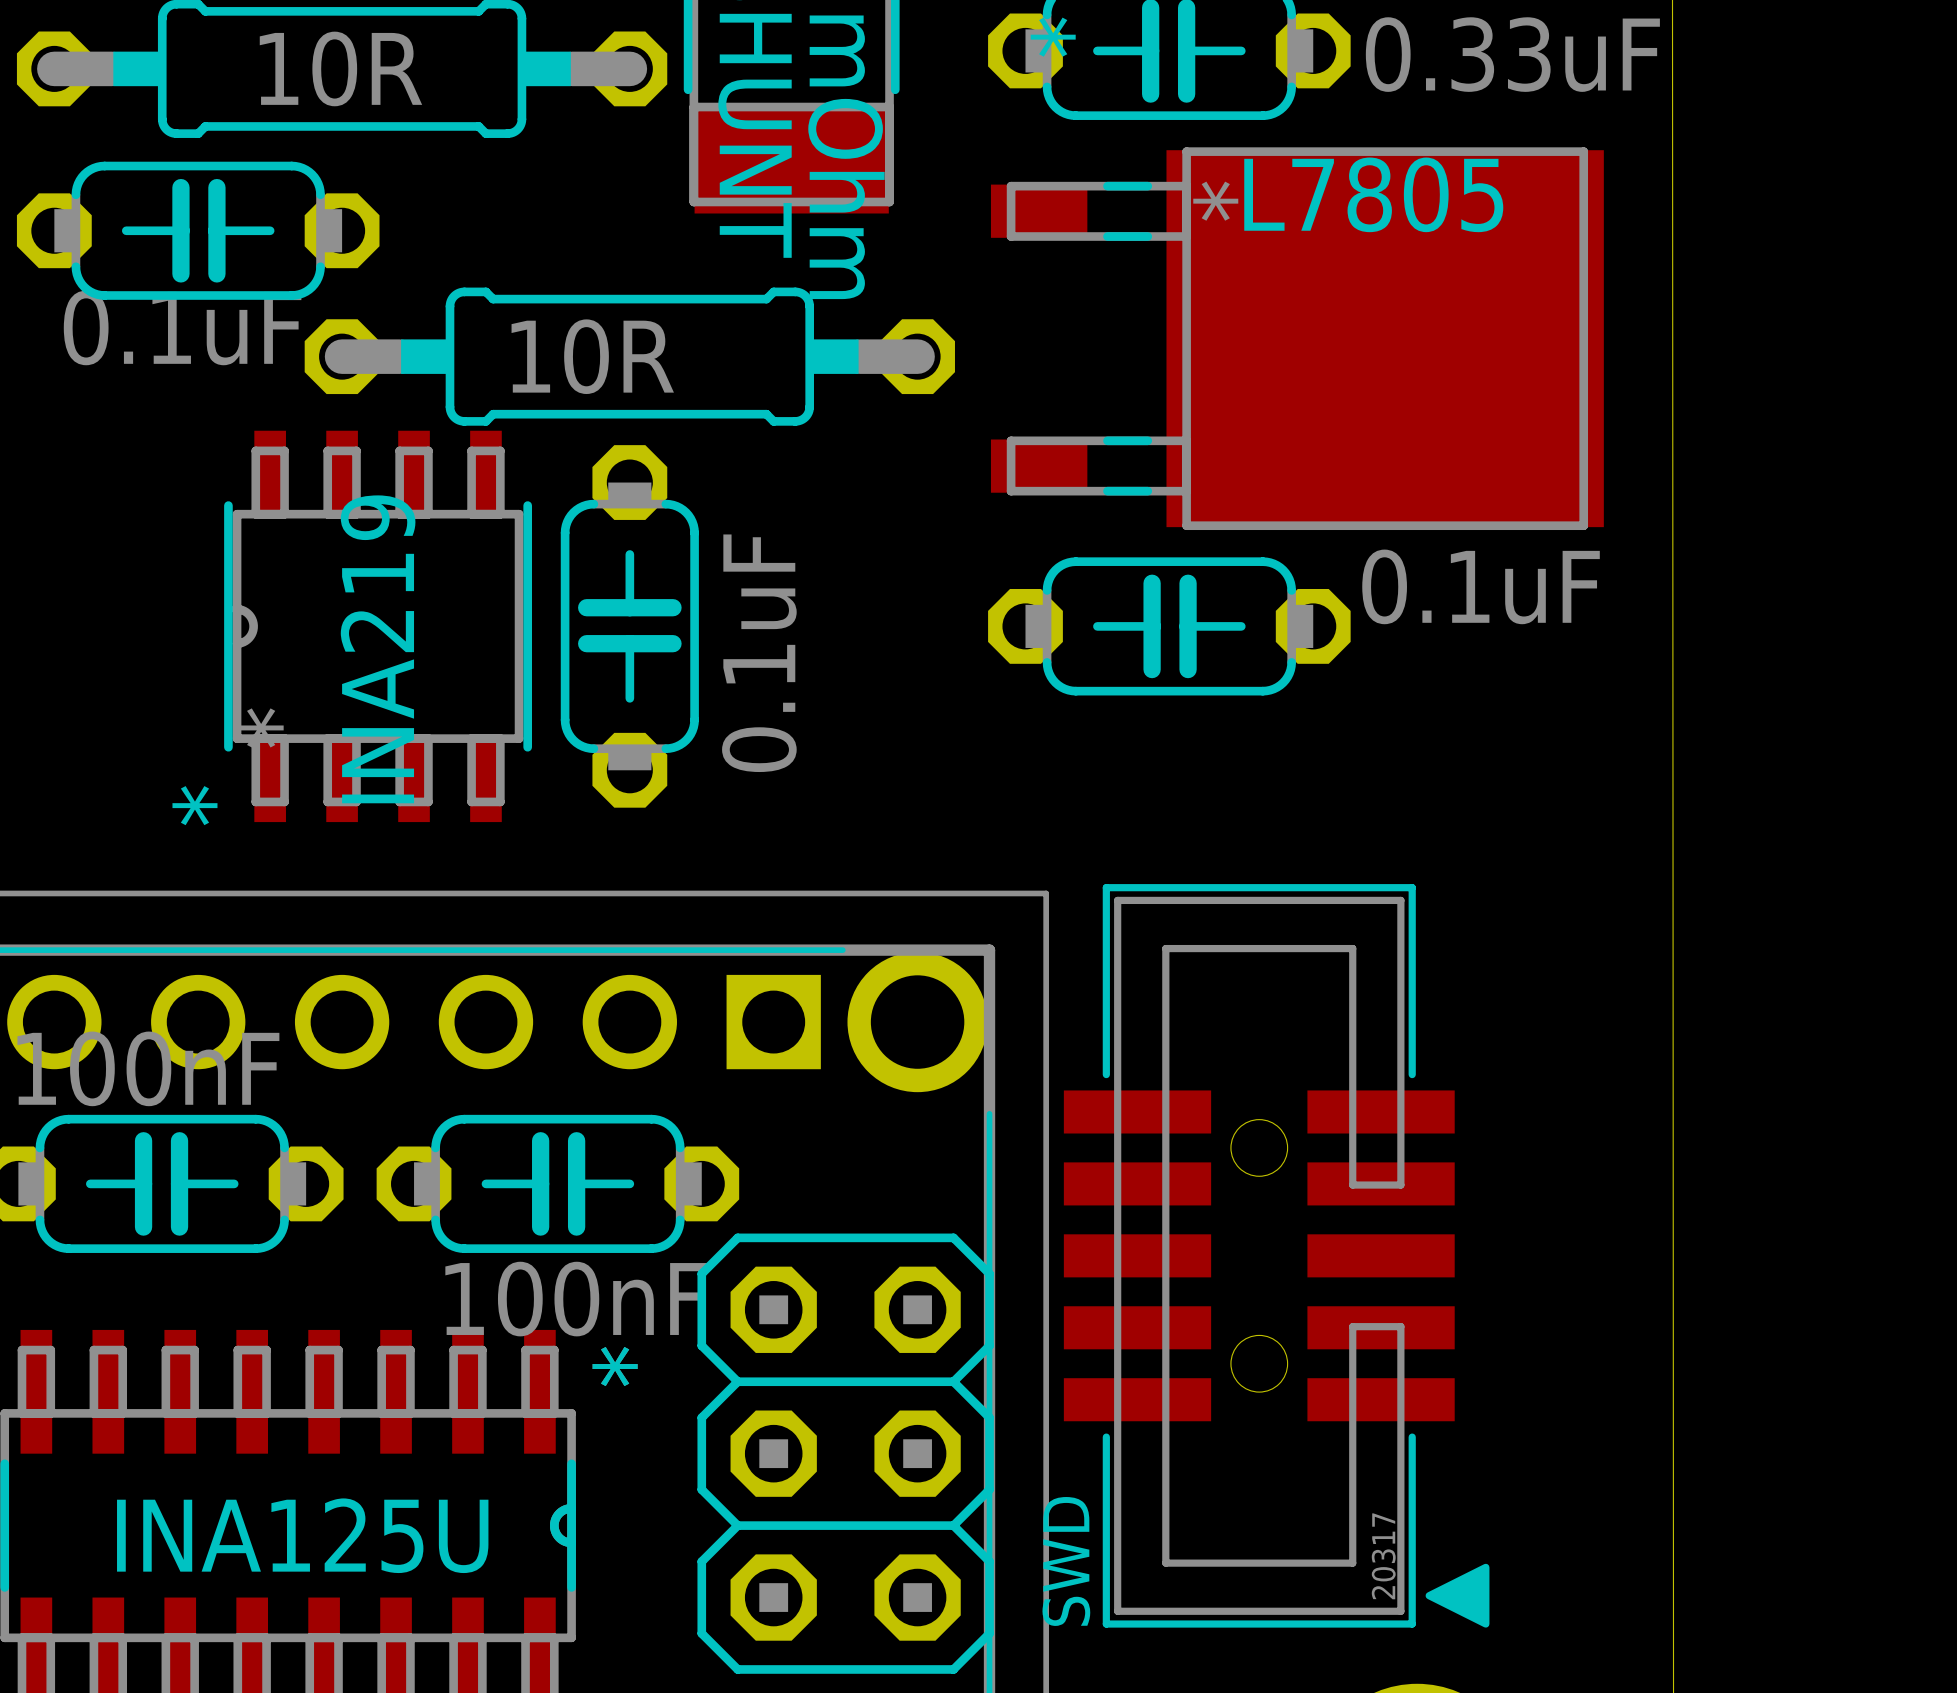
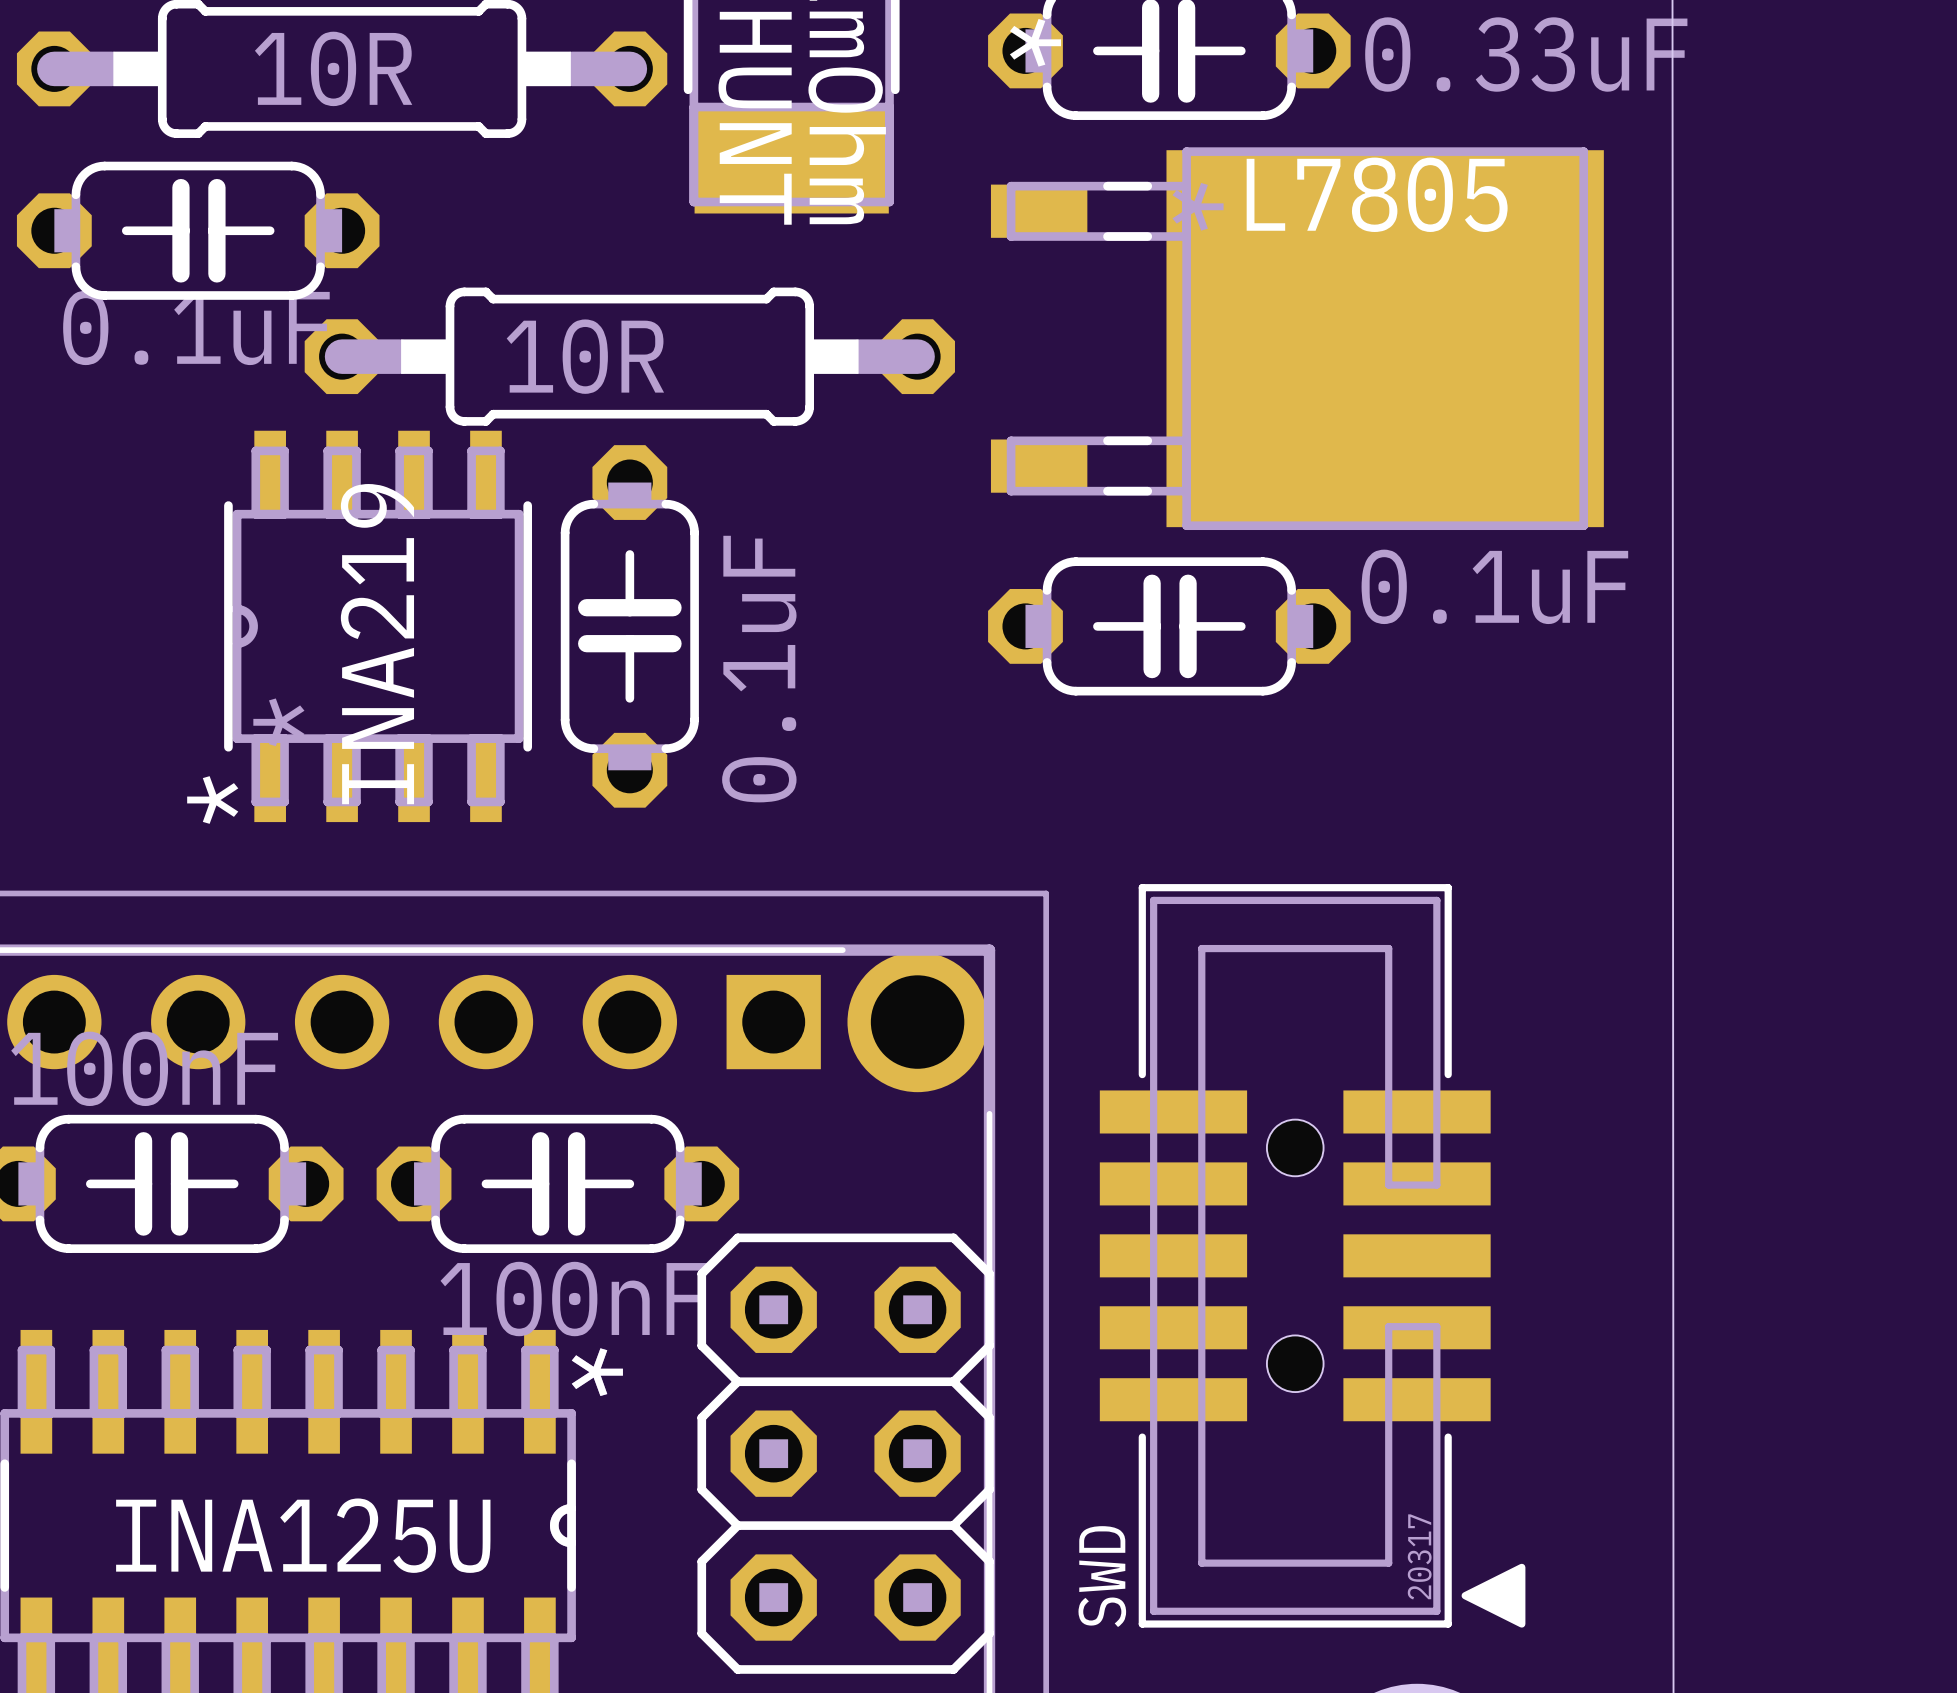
SWD position: (1276, 1255) -> (1312, 1255)

